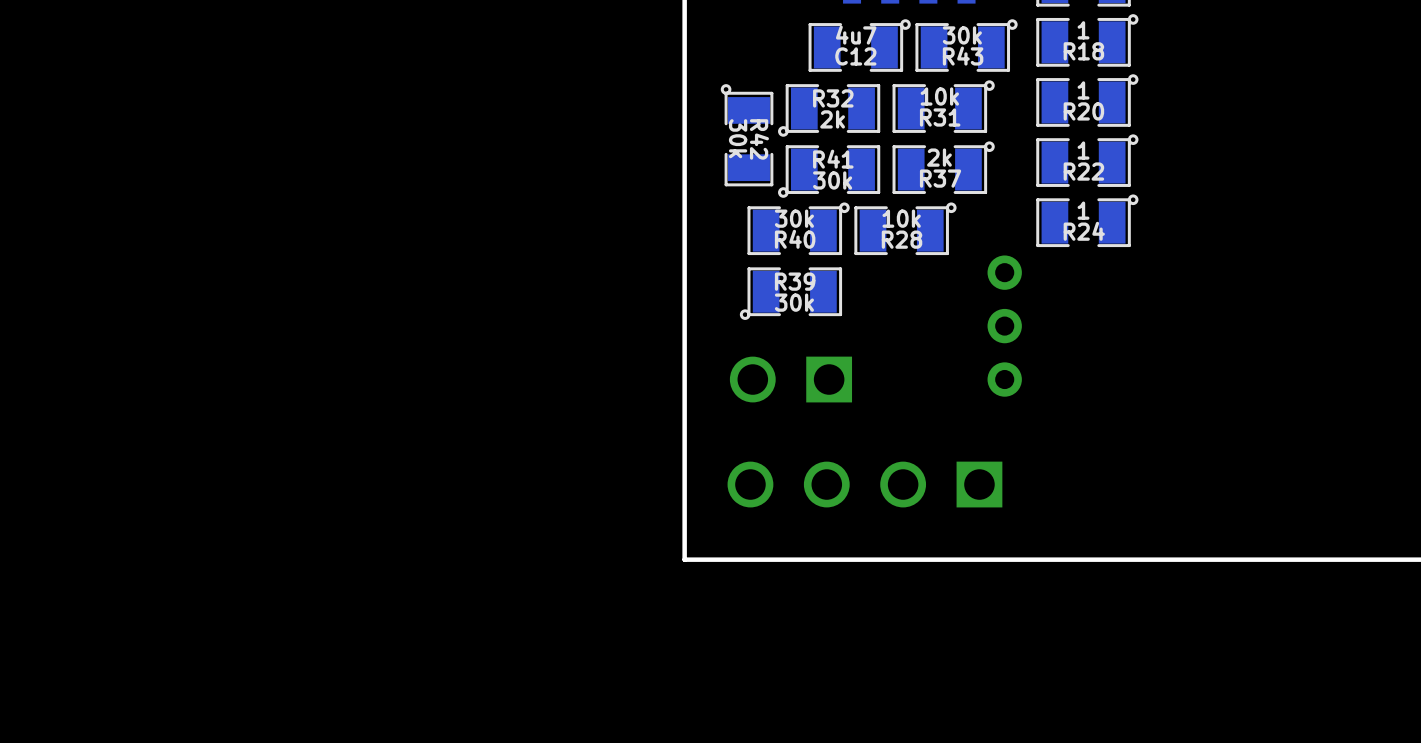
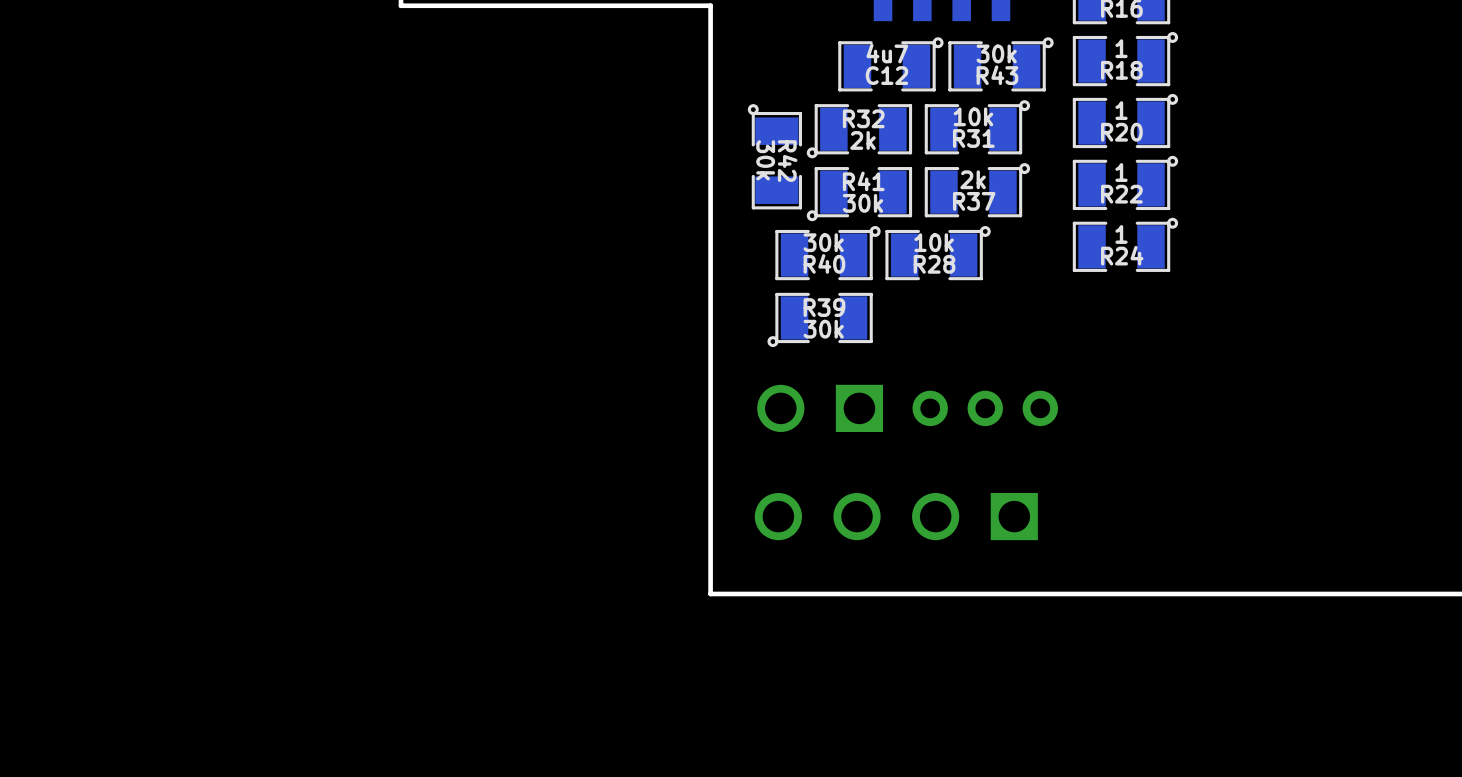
part: (1004, 272) -> none
part: (1004, 326) -> none
part: none -> (930, 408)
part: none -> (985, 408)

